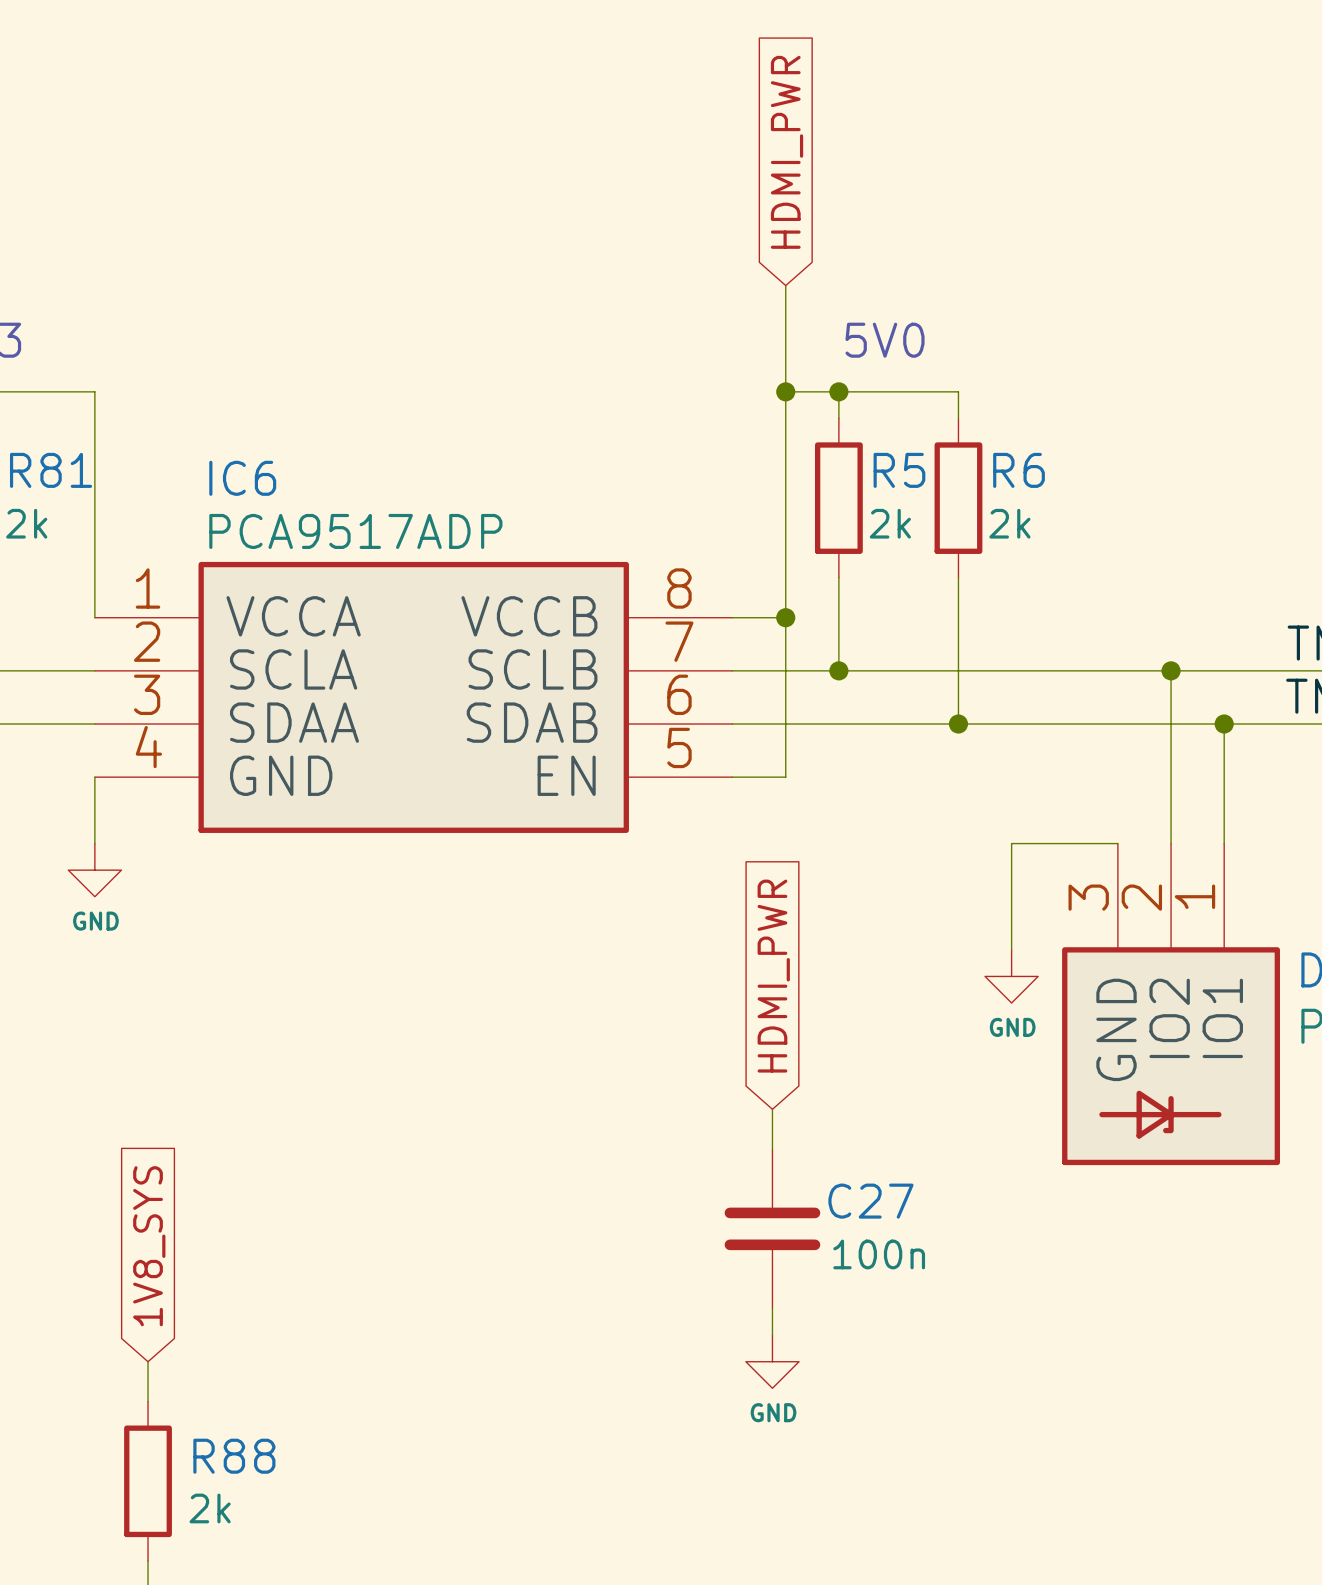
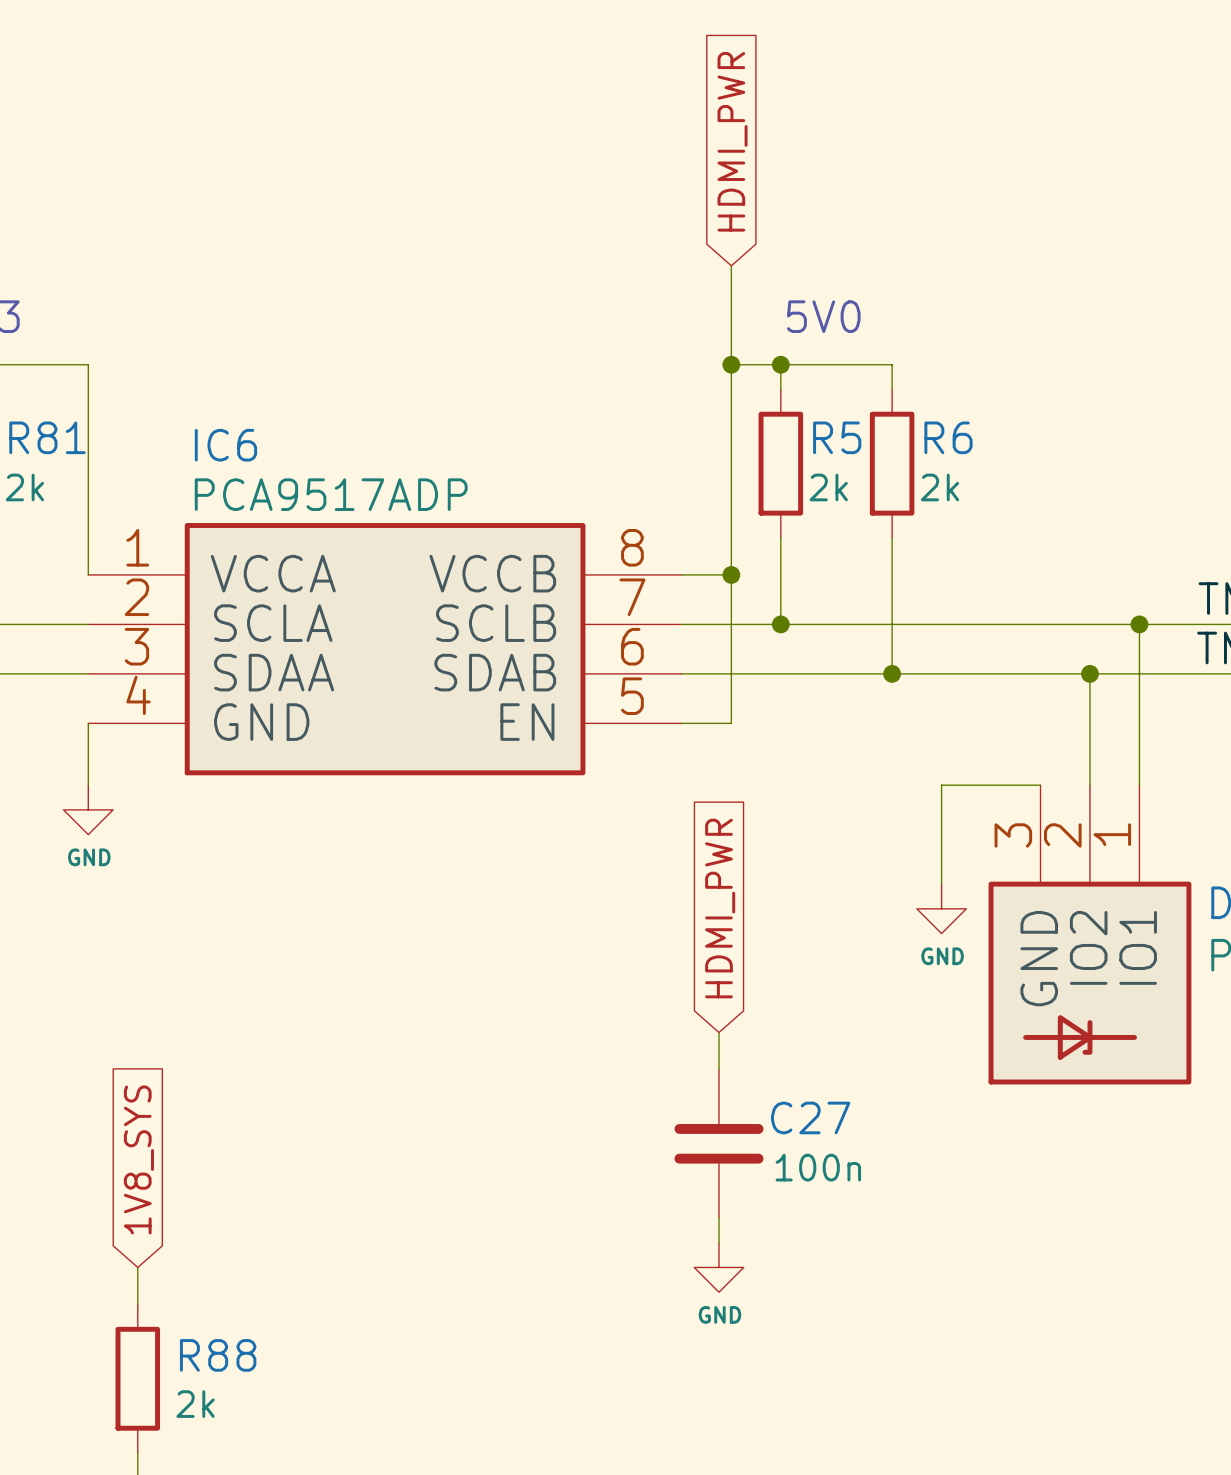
wire: (1171, 670) (1171, 724) -> (1139, 624) (1139, 673)
junction: (1171, 670) -> none
junction: none -> (1139, 624)
junction: none -> (1089, 673)
junction: (1224, 724) -> none

